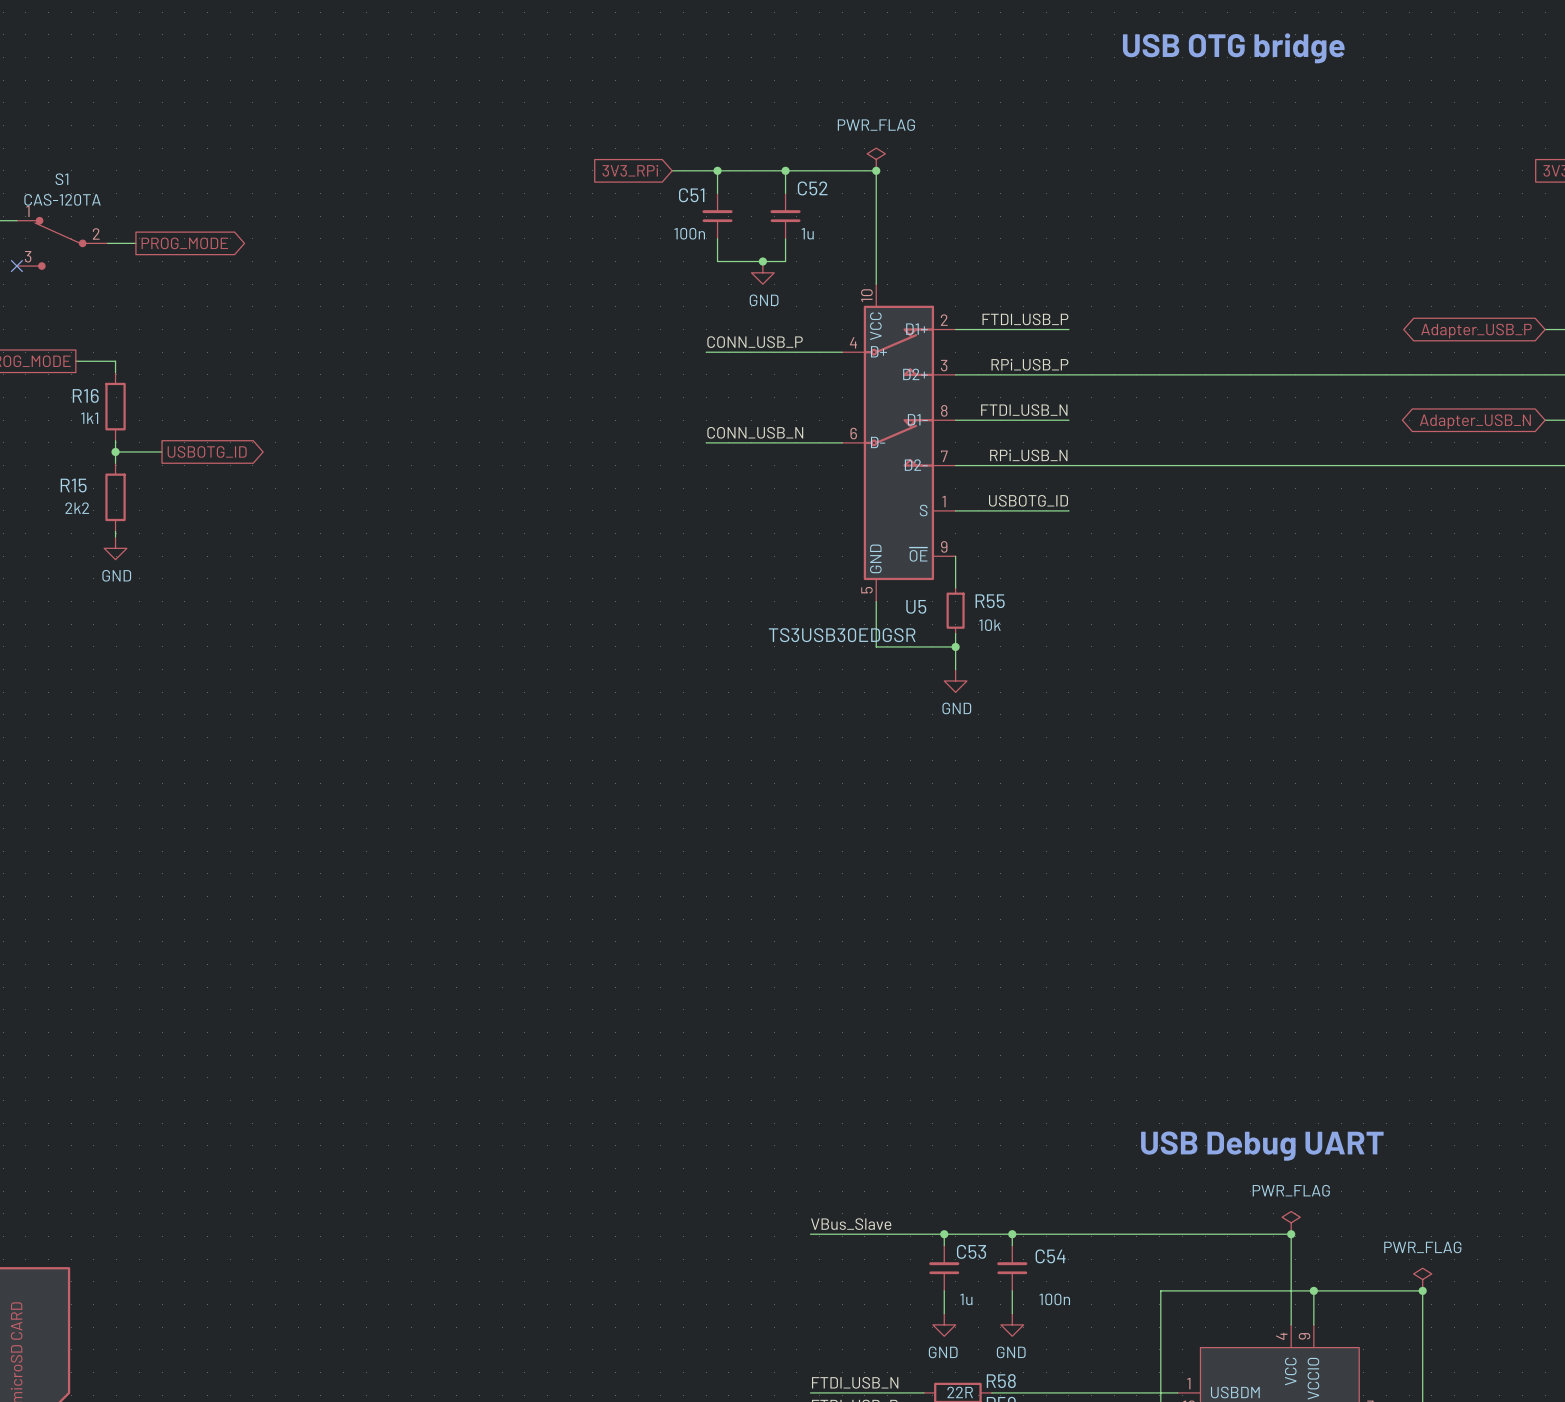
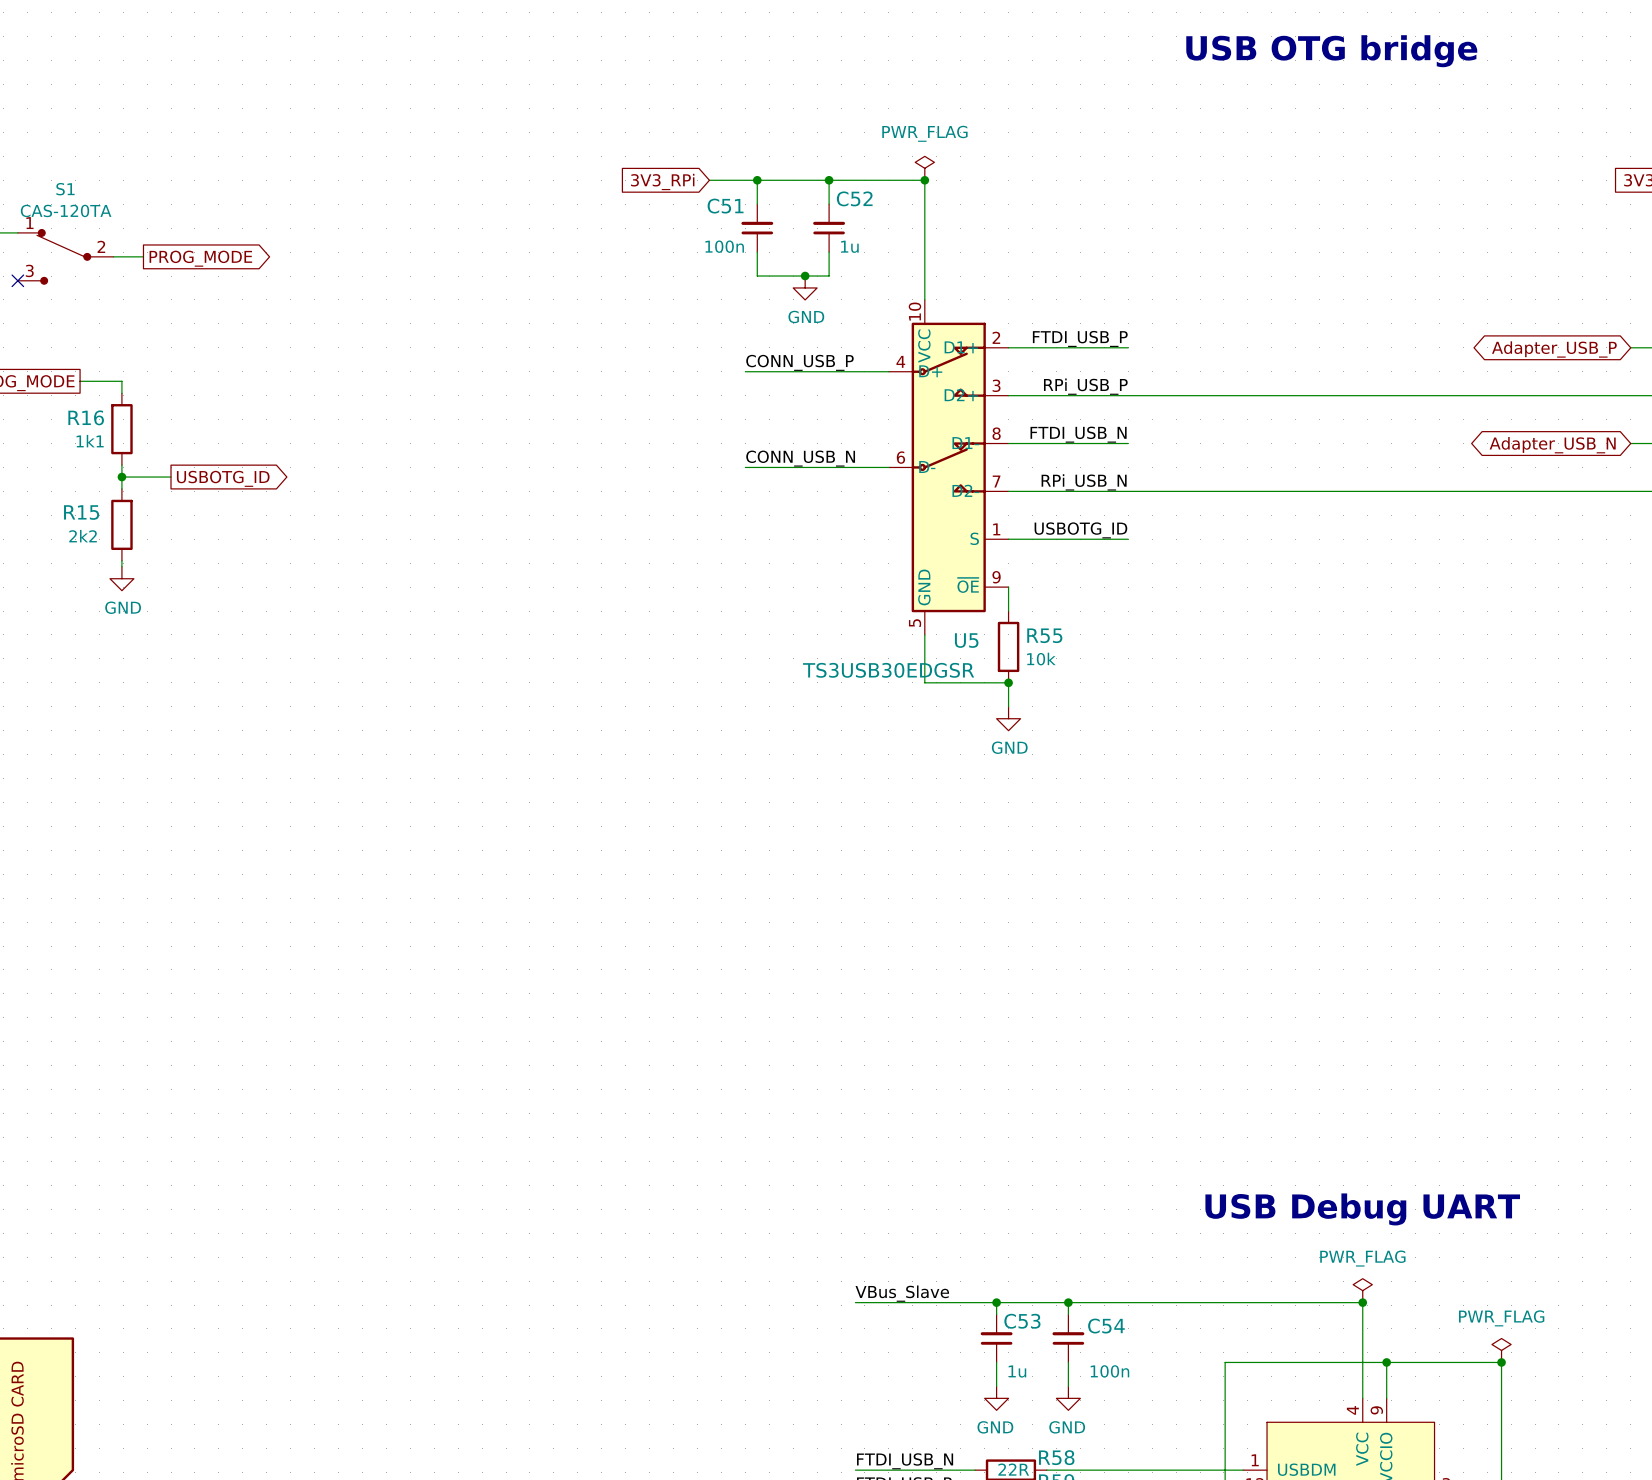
R55 symbol: [946, 588, 965, 634] -> [997, 611, 1020, 683]

